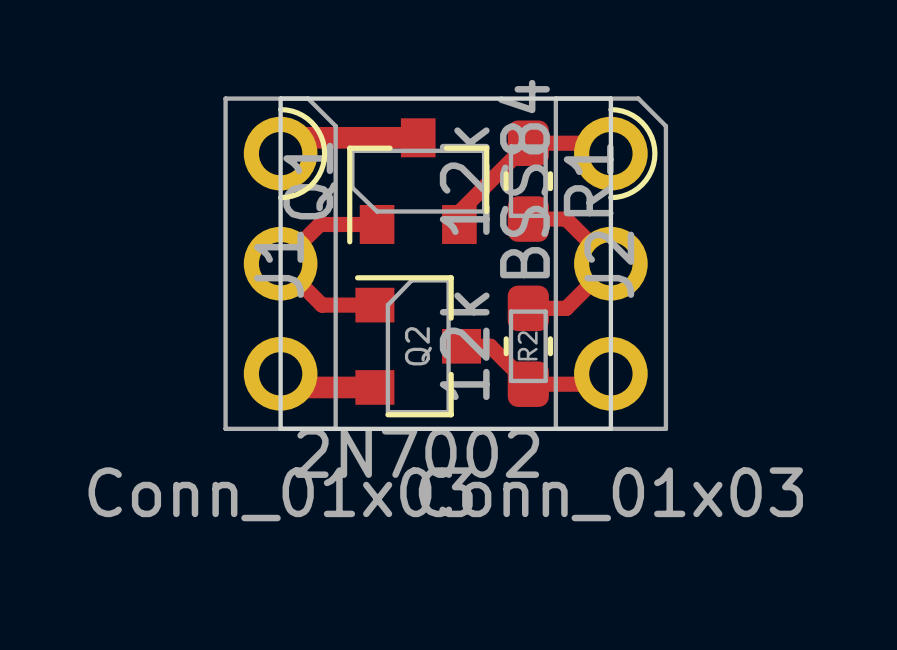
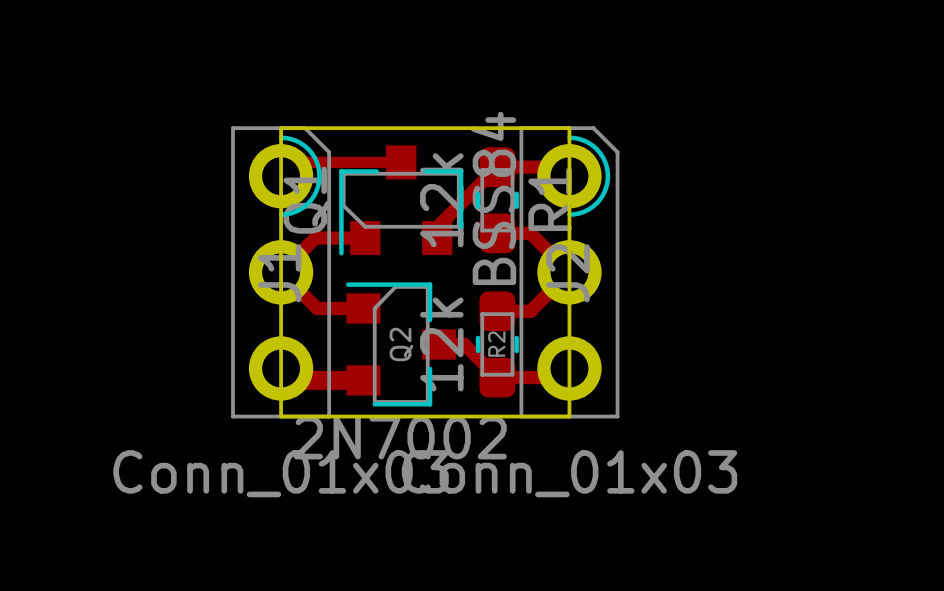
track width: thick (302, 137) (418, 137) -> thin (299, 162) (401, 162)

